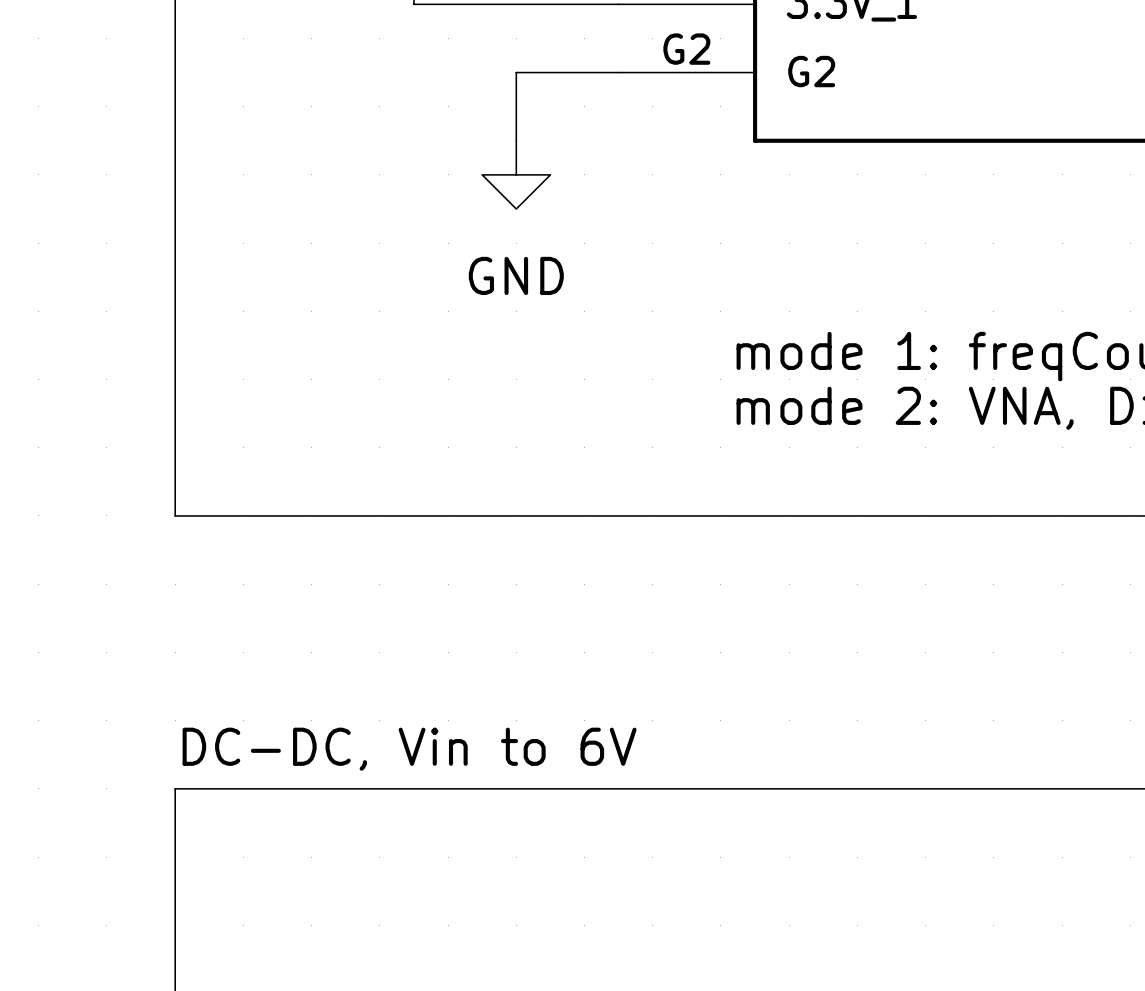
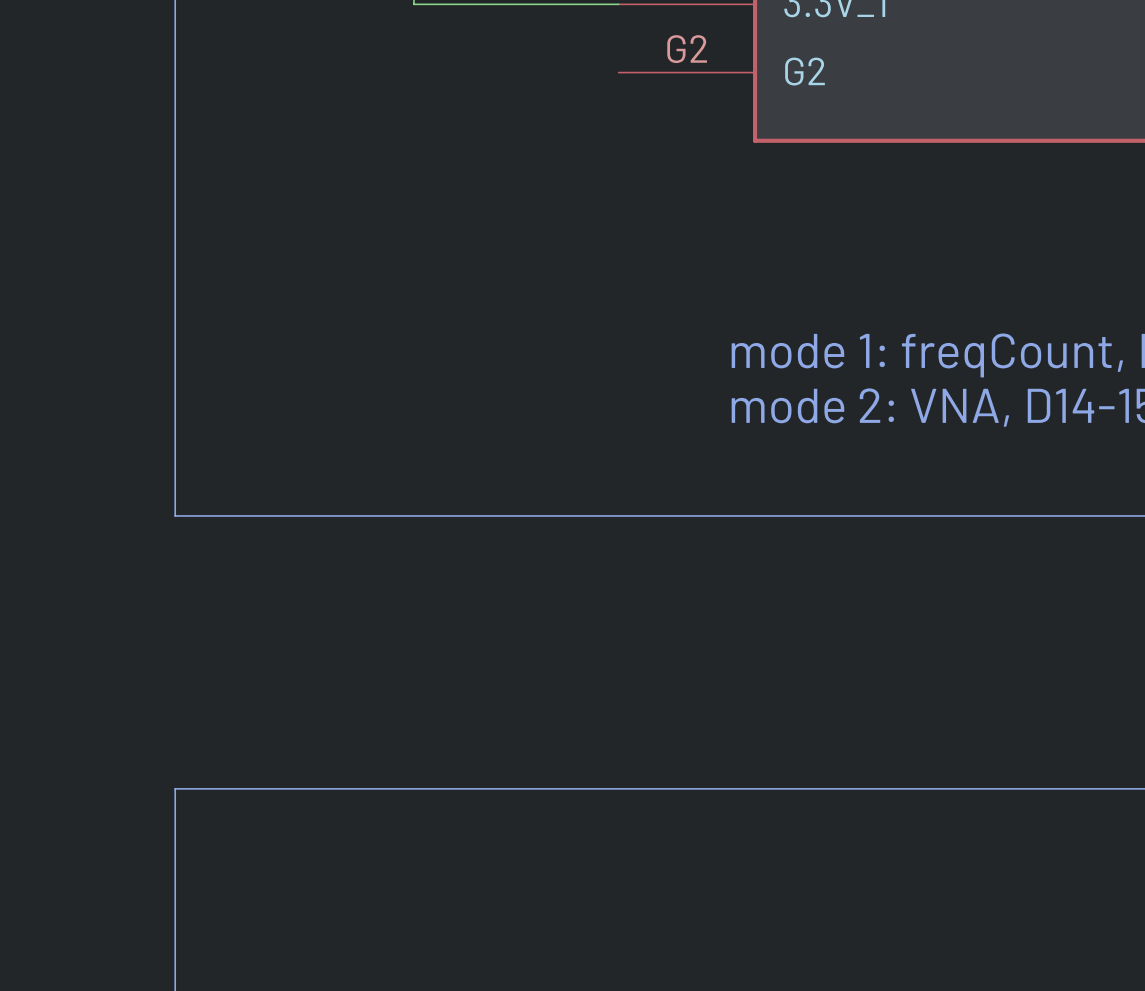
wire: (618, 72) (516, 72) (516, 140) -> none
power symbol: GND (516, 174) -> none
text: DC-DC, Vin to 6V (409, 749) -> none

